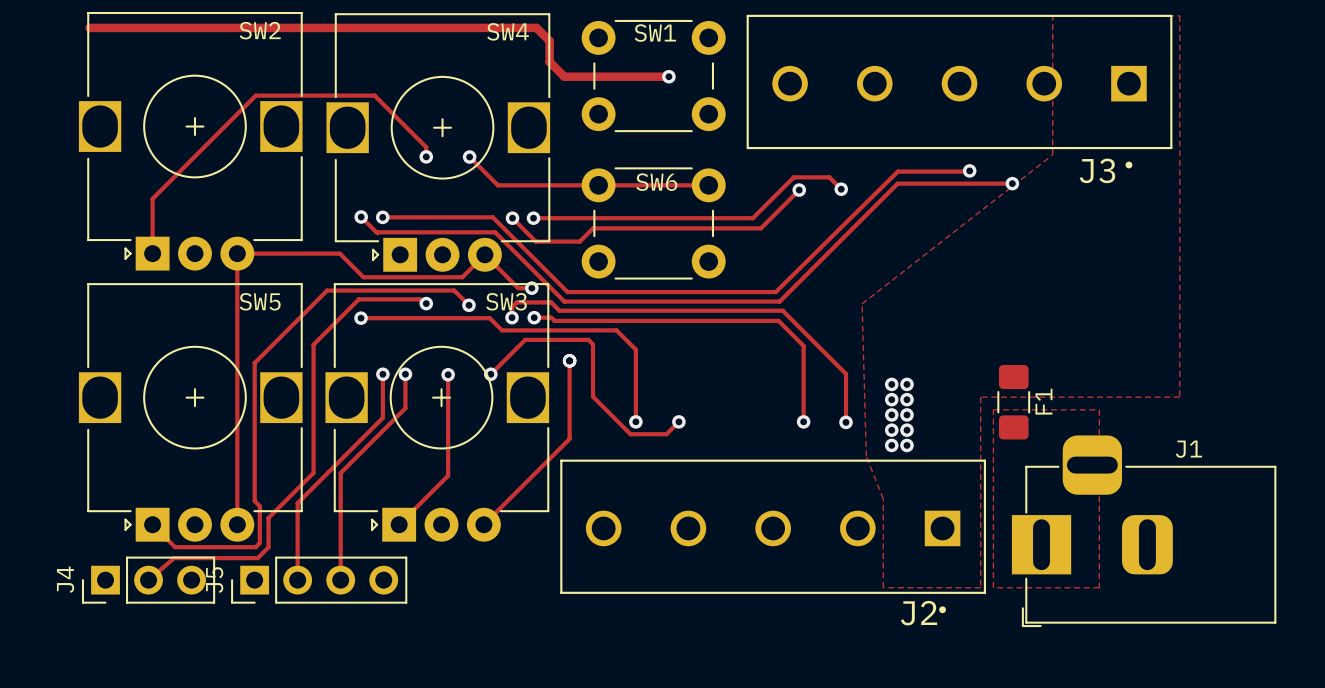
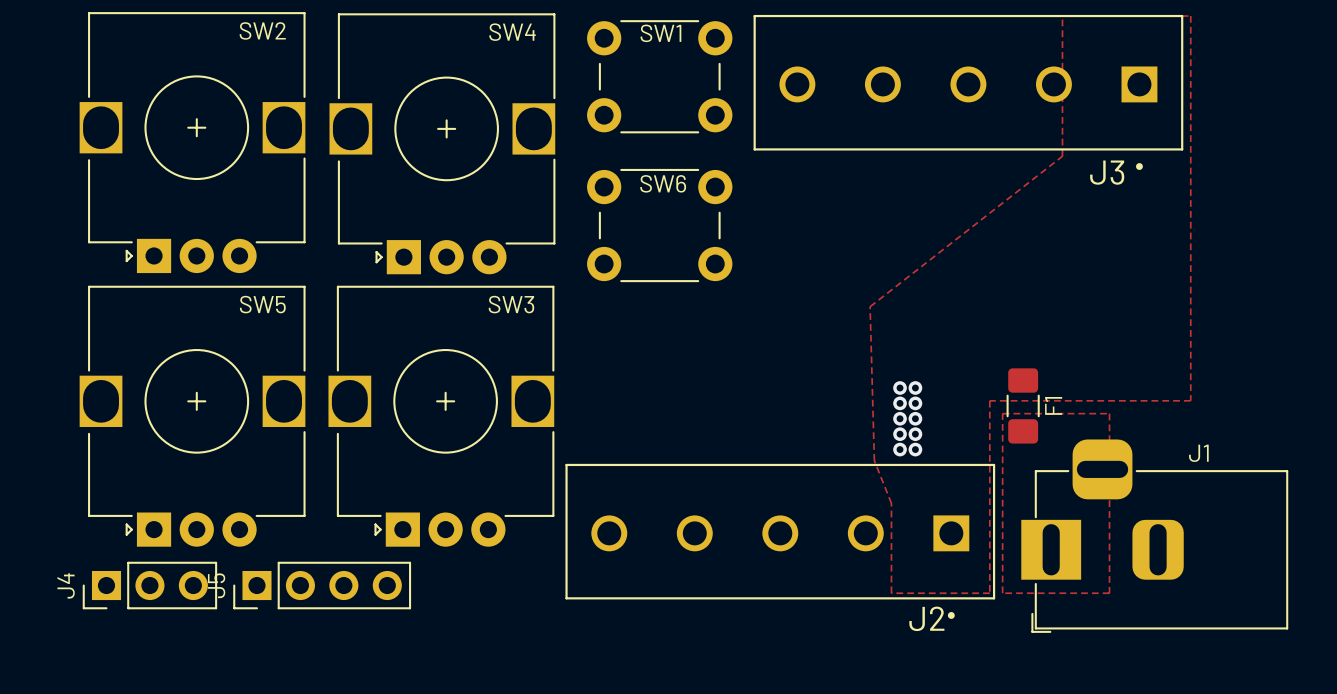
track: (89, 27) (536, 27) (549, 40) (549, 61) (564, 76) (668, 76) -> none
via: (668, 76) -> none
track: (426, 156) (426, 147) (374, 95) (255, 95) (152, 198) (152, 253) -> none
via: (426, 156) -> none
track: (469, 157) (497, 185) (708, 185) -> none
via: (469, 157) -> none
track: (969, 170) (897, 171) (775, 292) (567, 292) (492, 217) (382, 217) -> none
via: (969, 170) -> none
track: (1012, 183) (897, 183) (779, 301) (564, 301) (495, 232) (377, 233) (361, 217) -> none
via: (1012, 183) -> none
track: (841, 189) (829, 177) (793, 177) (752, 218) (533, 218) -> none
via: (841, 189) -> none
track: (799, 190) (760, 228) (593, 228) (579, 241) (535, 241) (512, 218) -> none
via: (799, 190) -> none
via: (361, 217) -> none
via: (382, 217) -> none
via: (512, 218) -> none
via: (533, 218) -> none
track: (531, 288) (518, 288) (484, 254) (462, 277) (363, 277) (339, 253) (237, 253) (237, 524) -> none
via: (531, 288) -> none
via: (426, 303) -> none
track: (468, 305) (454, 290) (327, 290) (254, 362) (254, 501) (259, 506) (259, 543) (255, 547) (175, 547) (152, 524) -> none
via: (468, 305) -> none
track: (426, 306) (419, 299) (358, 299) (313, 344) (313, 472) (268, 518) (268, 547) (257, 558) (174, 558) (148, 580) -> none
track: (512, 317) (512, 307) (516, 302) (551, 302) (559, 310) (782, 310) (845, 373) (845, 422) -> none
via: (512, 317) -> none
track: (534, 317) (551, 317) (554, 320) (778, 320) (803, 345) (803, 421) -> none
via: (534, 317) -> none
track: (361, 318) (489, 318) (502, 330) (616, 330) (635, 349) (635, 421) -> none
via: (361, 318) -> none
track: (569, 360) (569, 438) (483, 524) -> none
via: (569, 360) -> none
track: (382, 374) (382, 417) (297, 503) (297, 580) -> none
via: (382, 374) -> none
track: (405, 374) (405, 408) (340, 473) (340, 580) -> none
via: (405, 374) -> none
track: (448, 374) (448, 475) (399, 524) -> none
via: (448, 374) -> none
track: (490, 374) (525, 339) (588, 339) (593, 344) (593, 396) (630, 434) (666, 434) (678, 421) -> none
via: (490, 374) -> none
via: (635, 421) -> none
via: (678, 421) -> none
via: (803, 421) -> none
via: (845, 422) -> none

